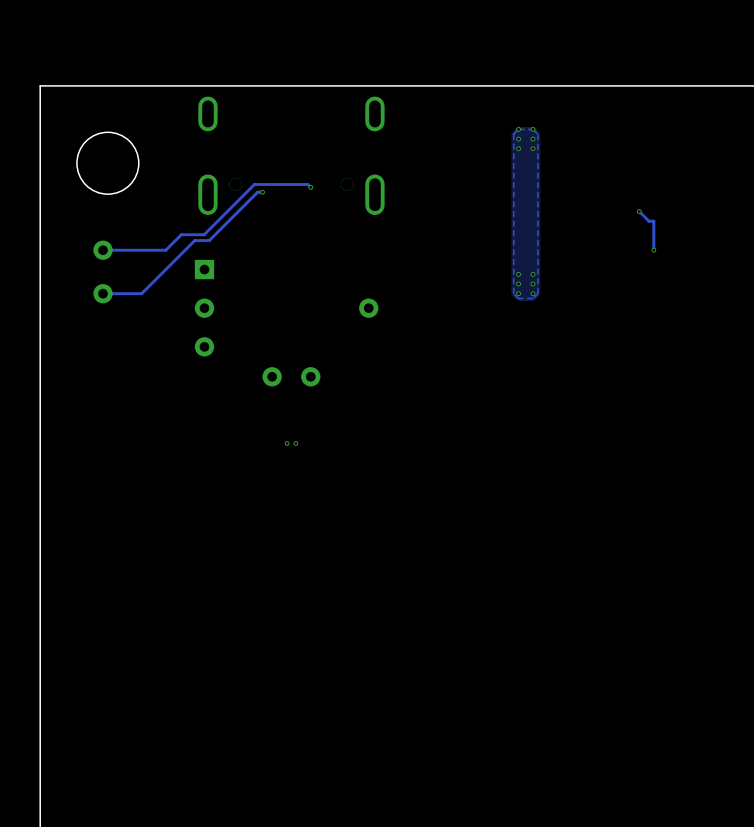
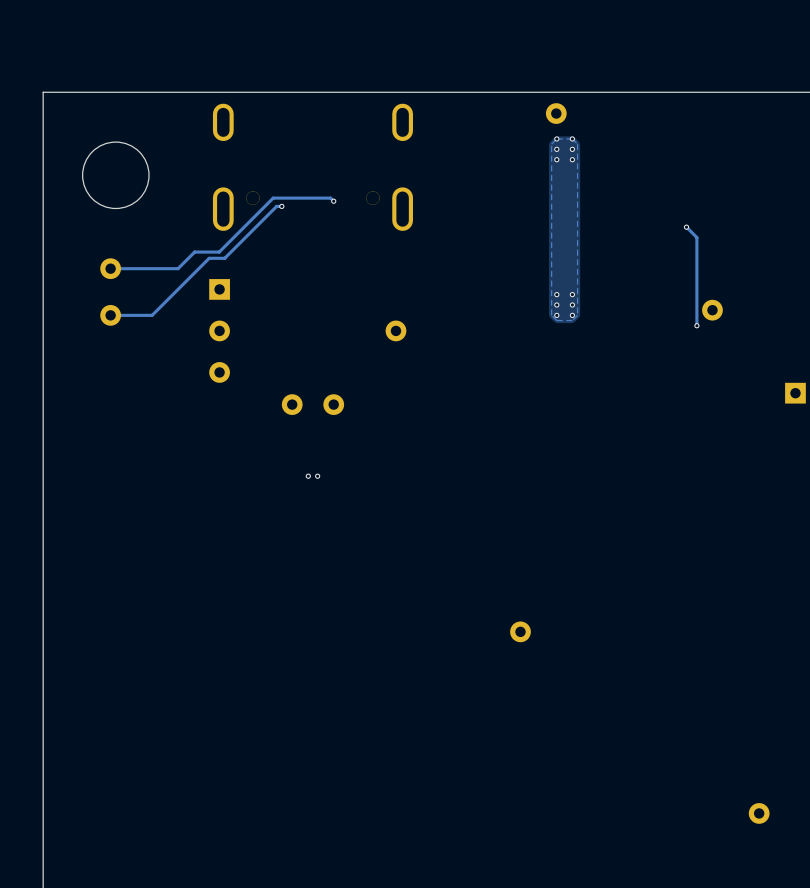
part: none -> (556, 113)
track: (649, 221) (653, 221) (653, 250) -> (696, 237) (696, 325)
via position: (653, 250) -> (696, 325)
part: none -> (712, 310)
part: none -> (795, 393)
part: none -> (520, 631)
part: none -> (759, 813)

